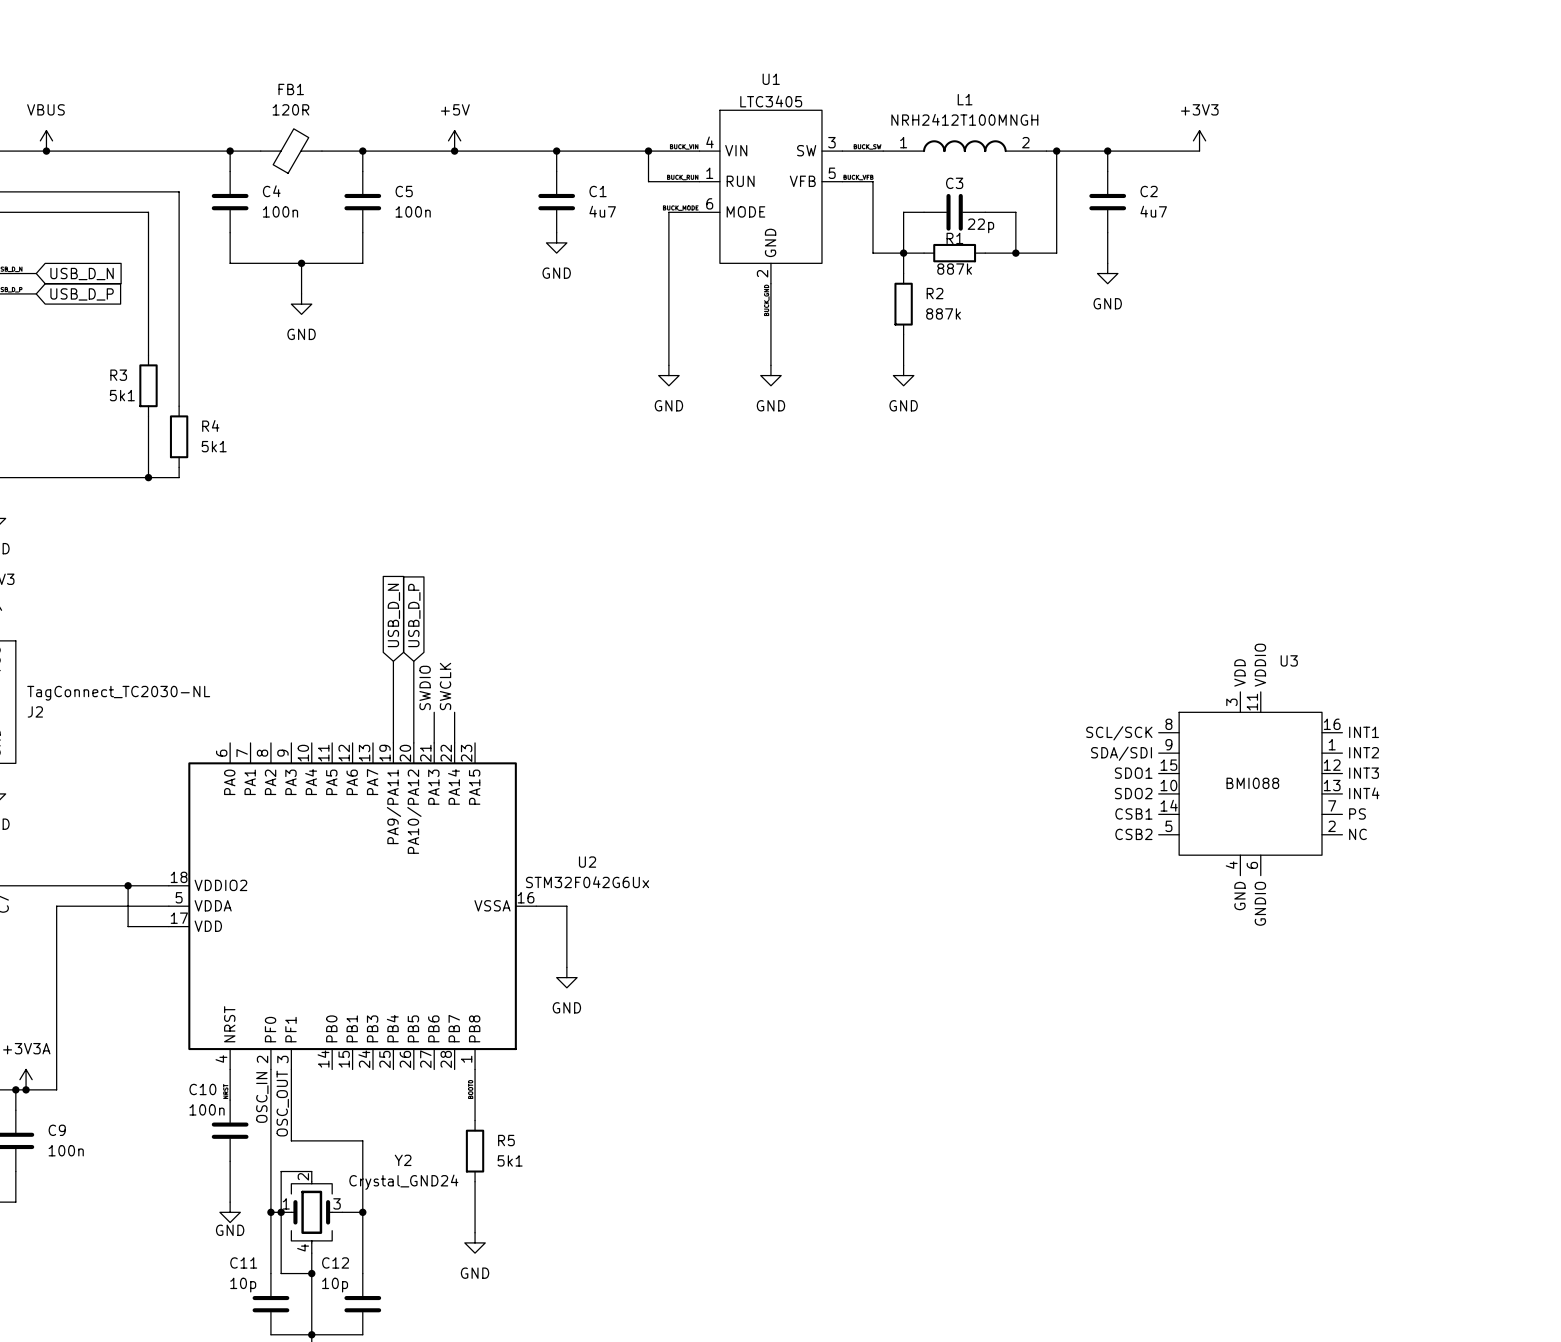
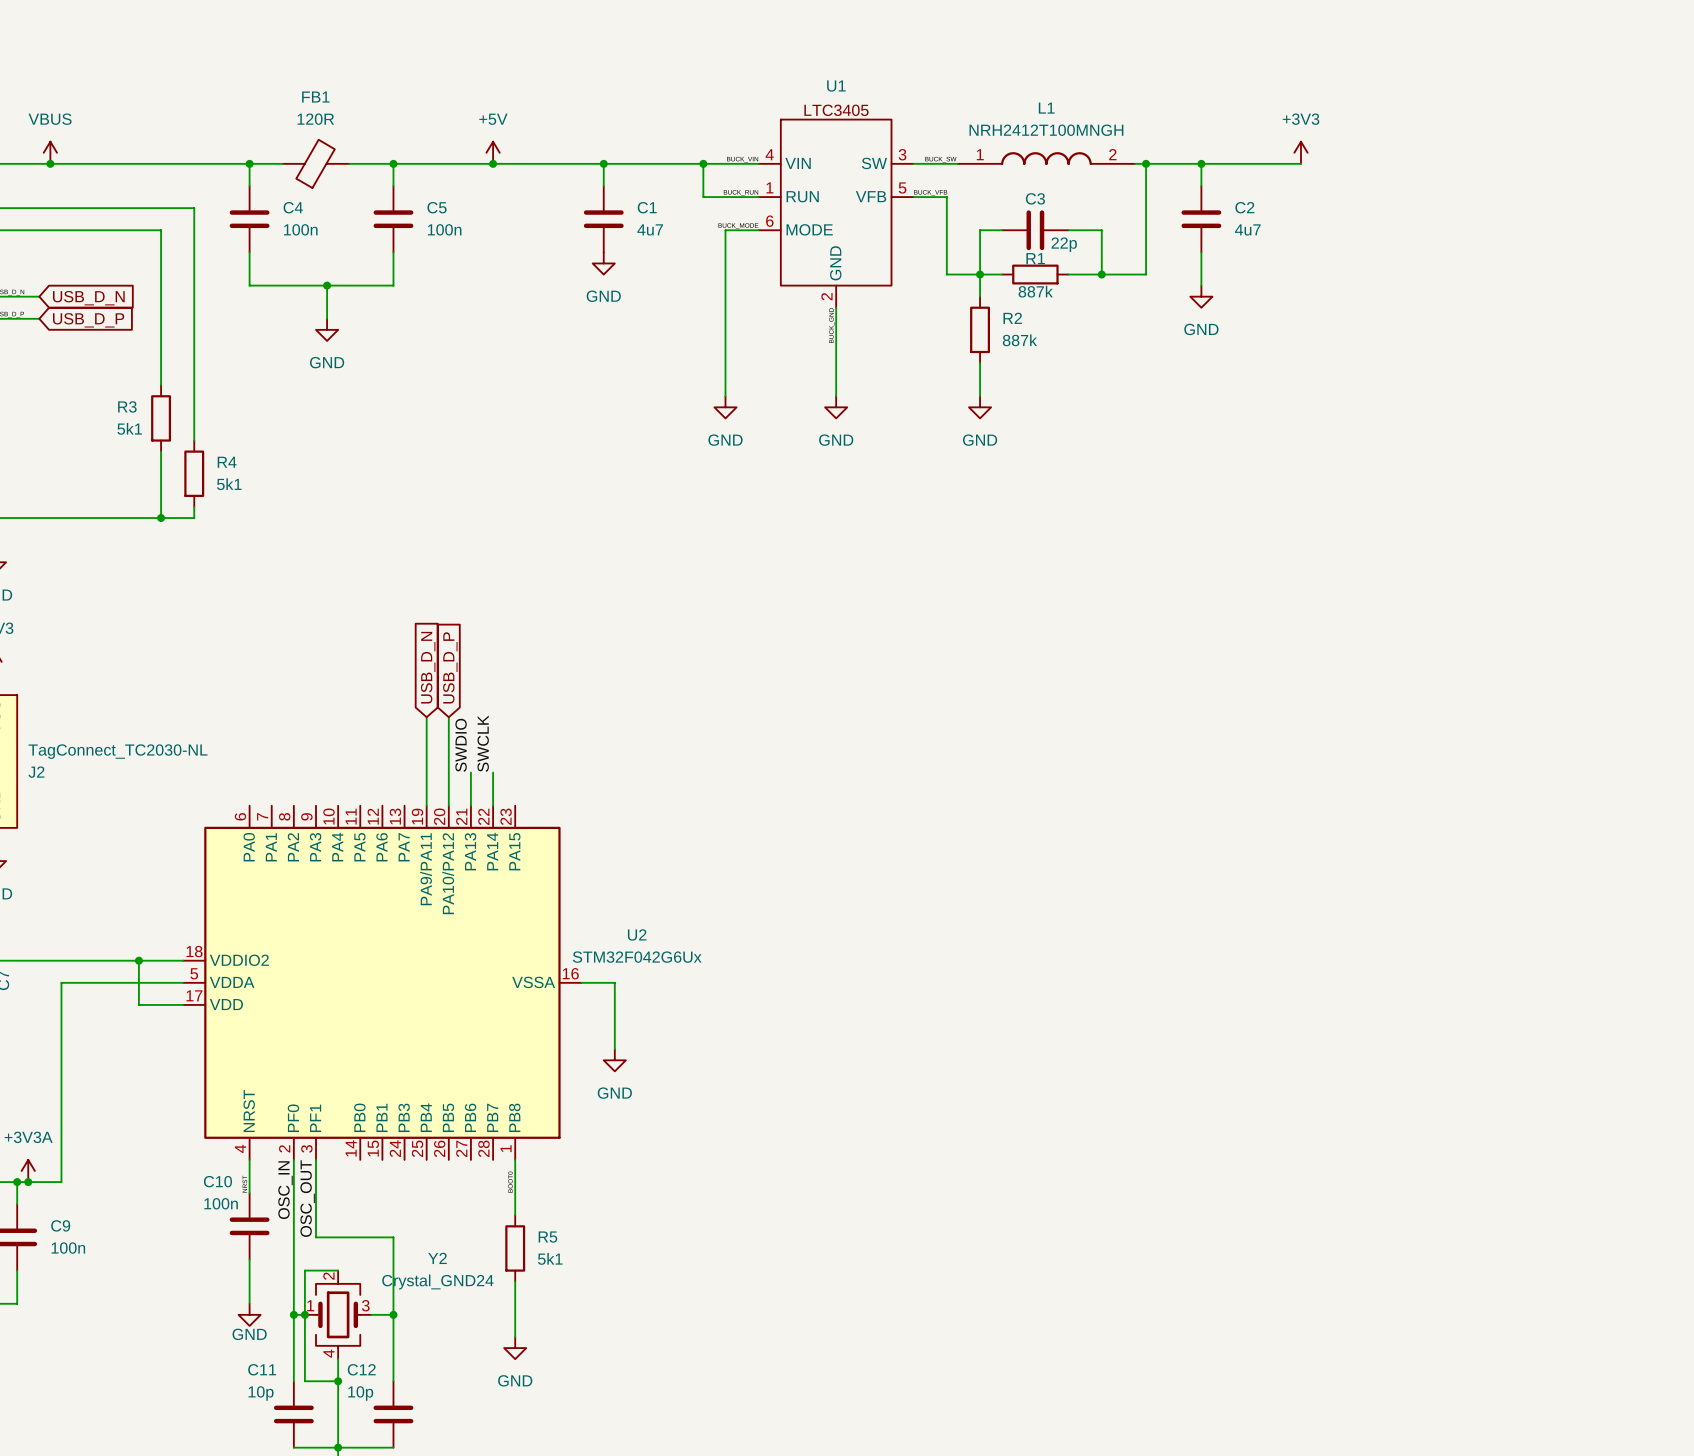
U3: (1250, 783) -> none

